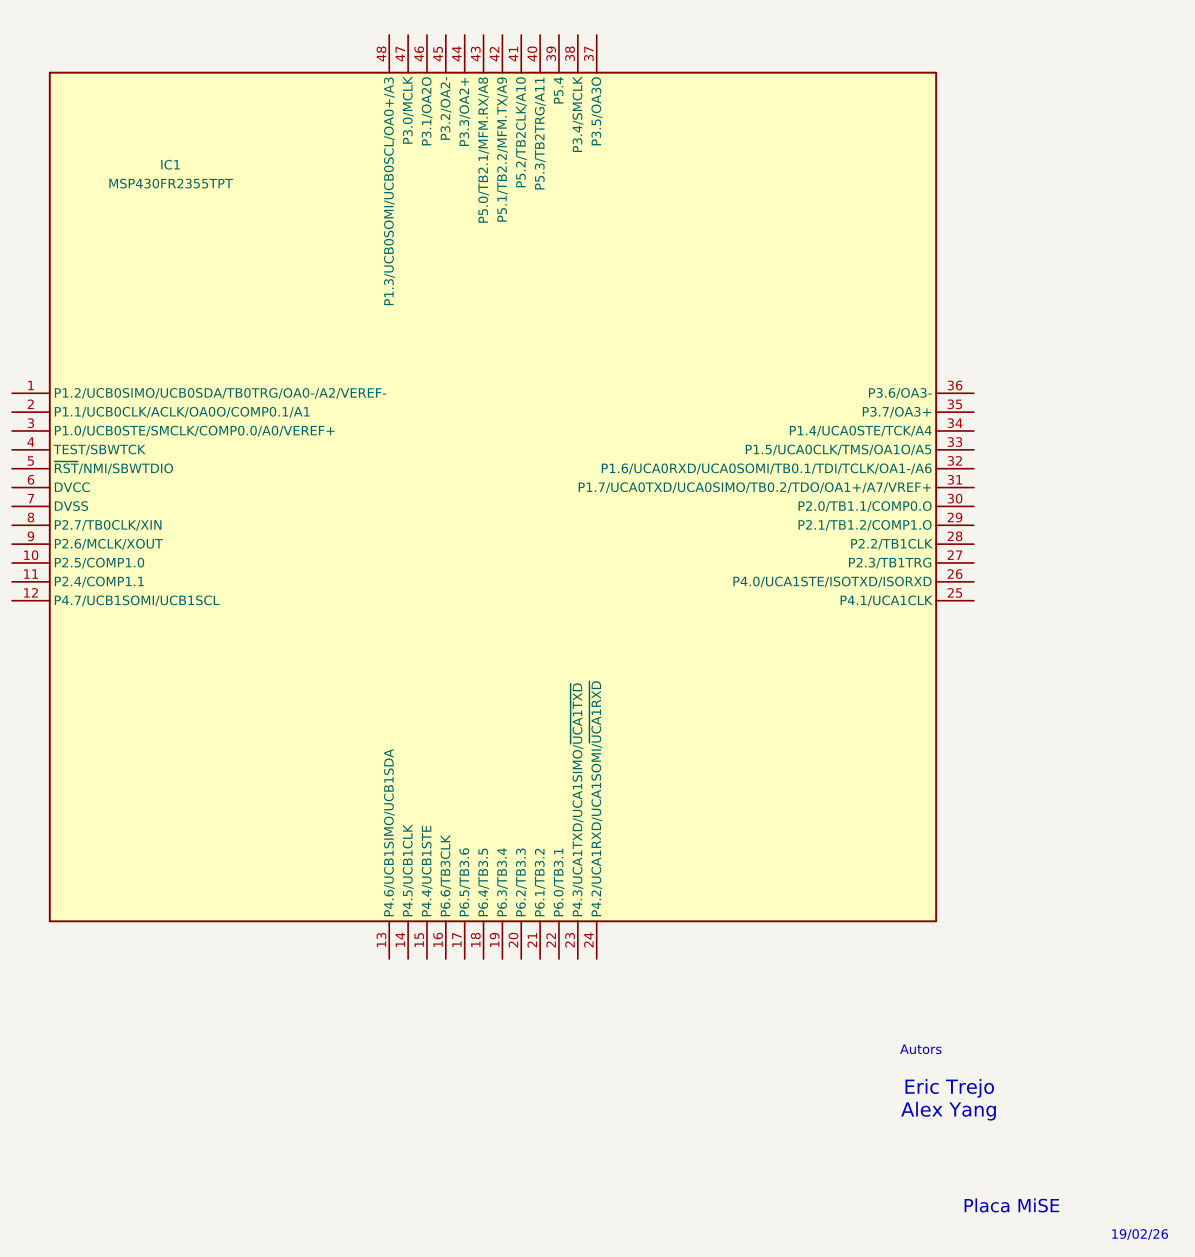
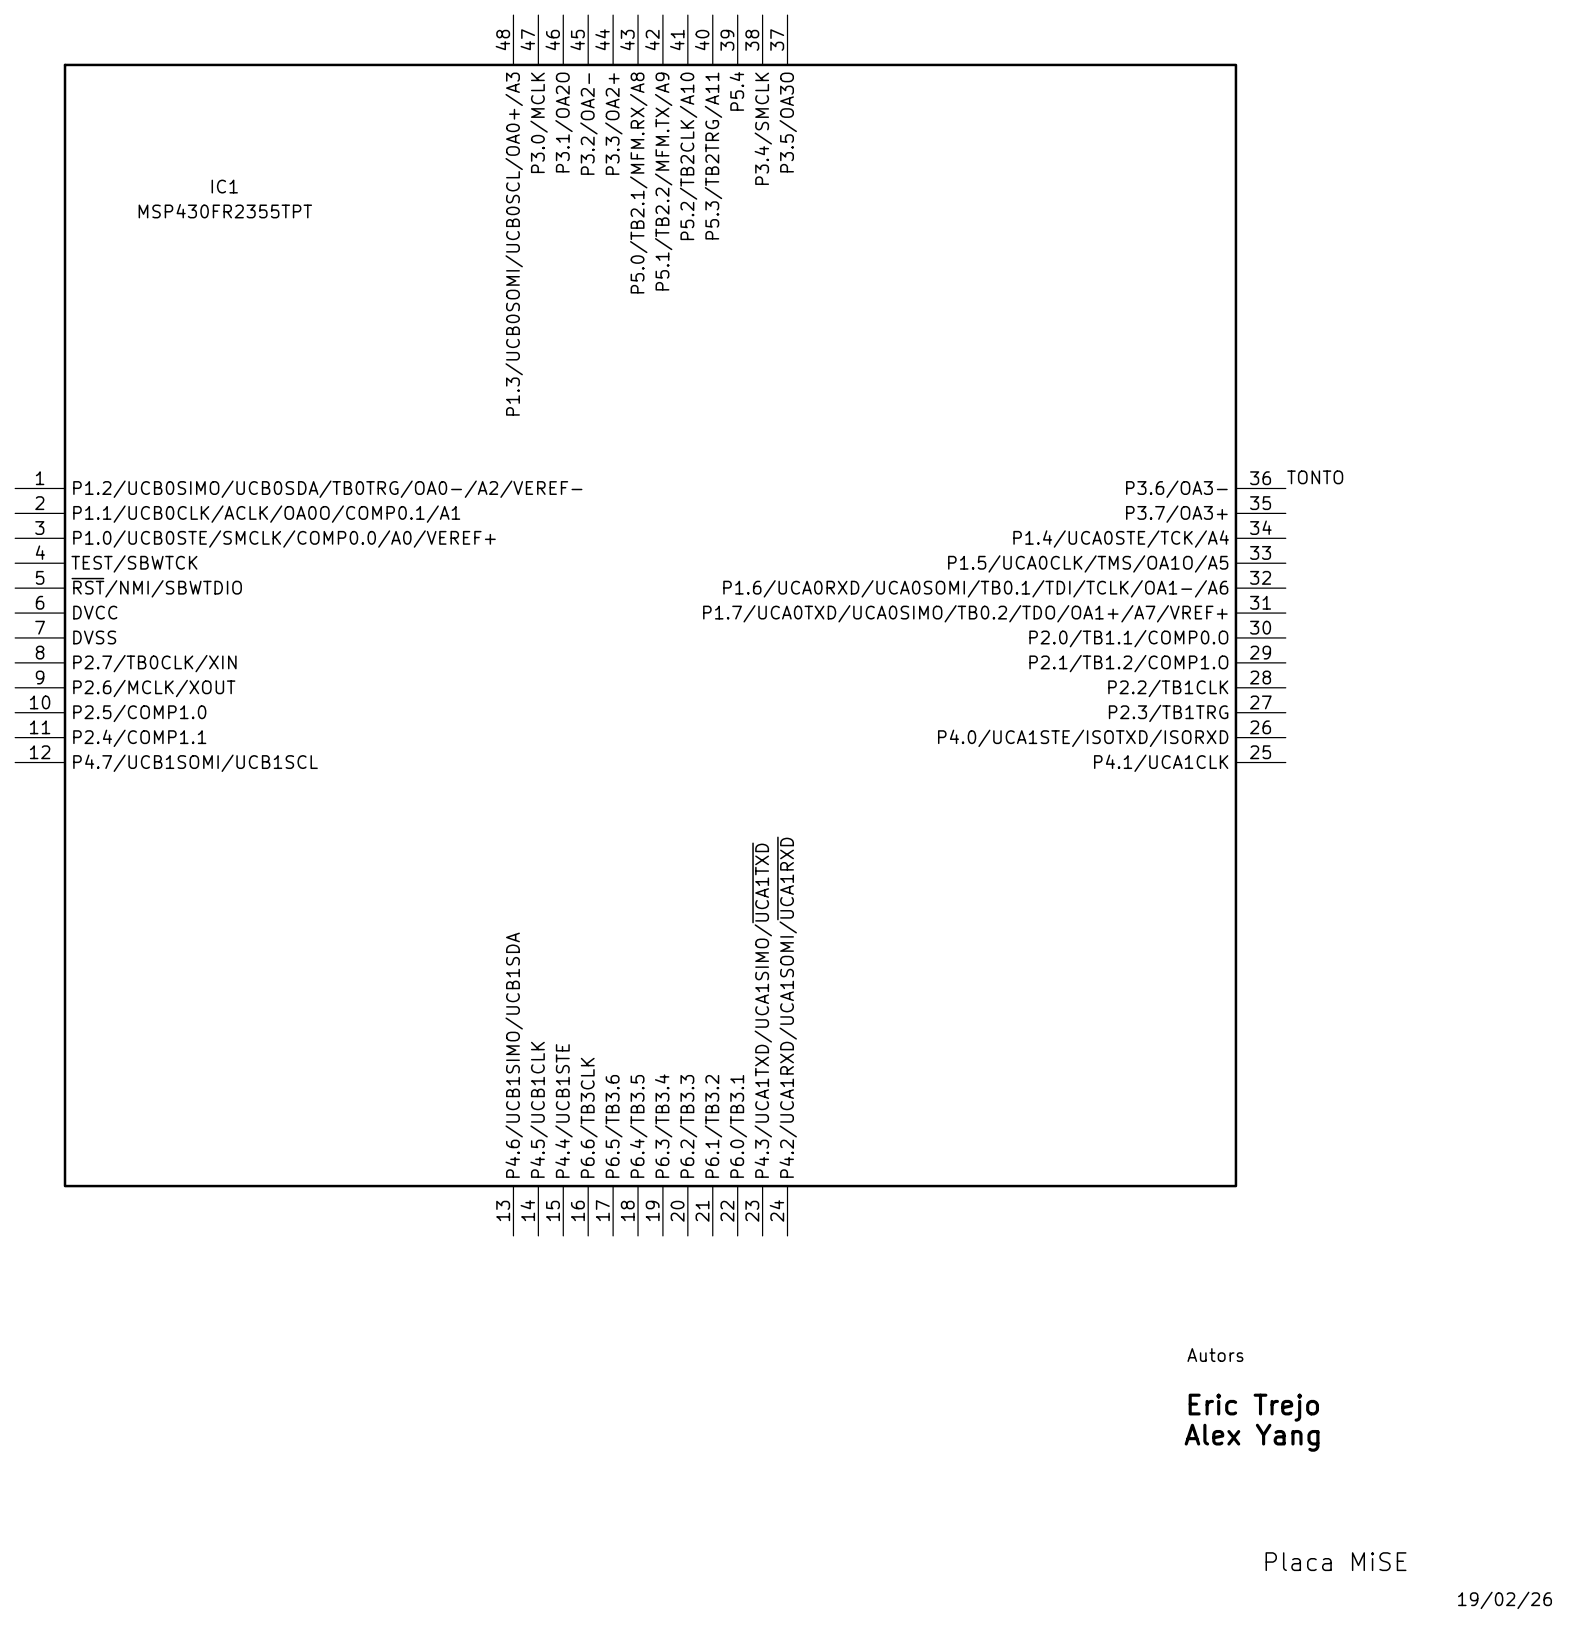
label: none -> TONTO (1315, 477)

